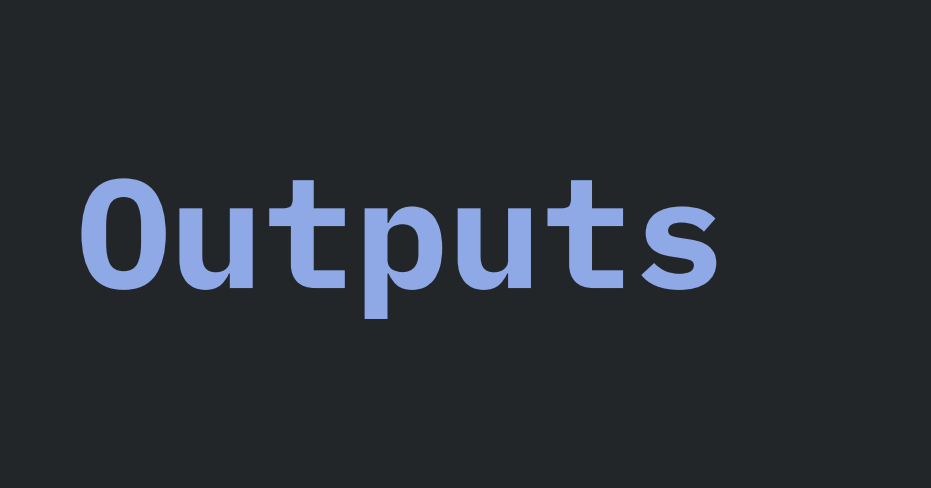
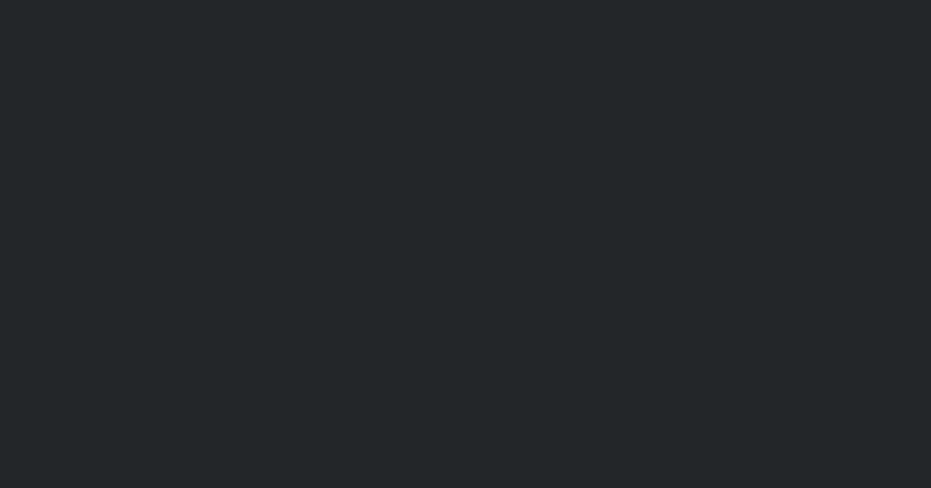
text: Outputs (398, 248) -> none

